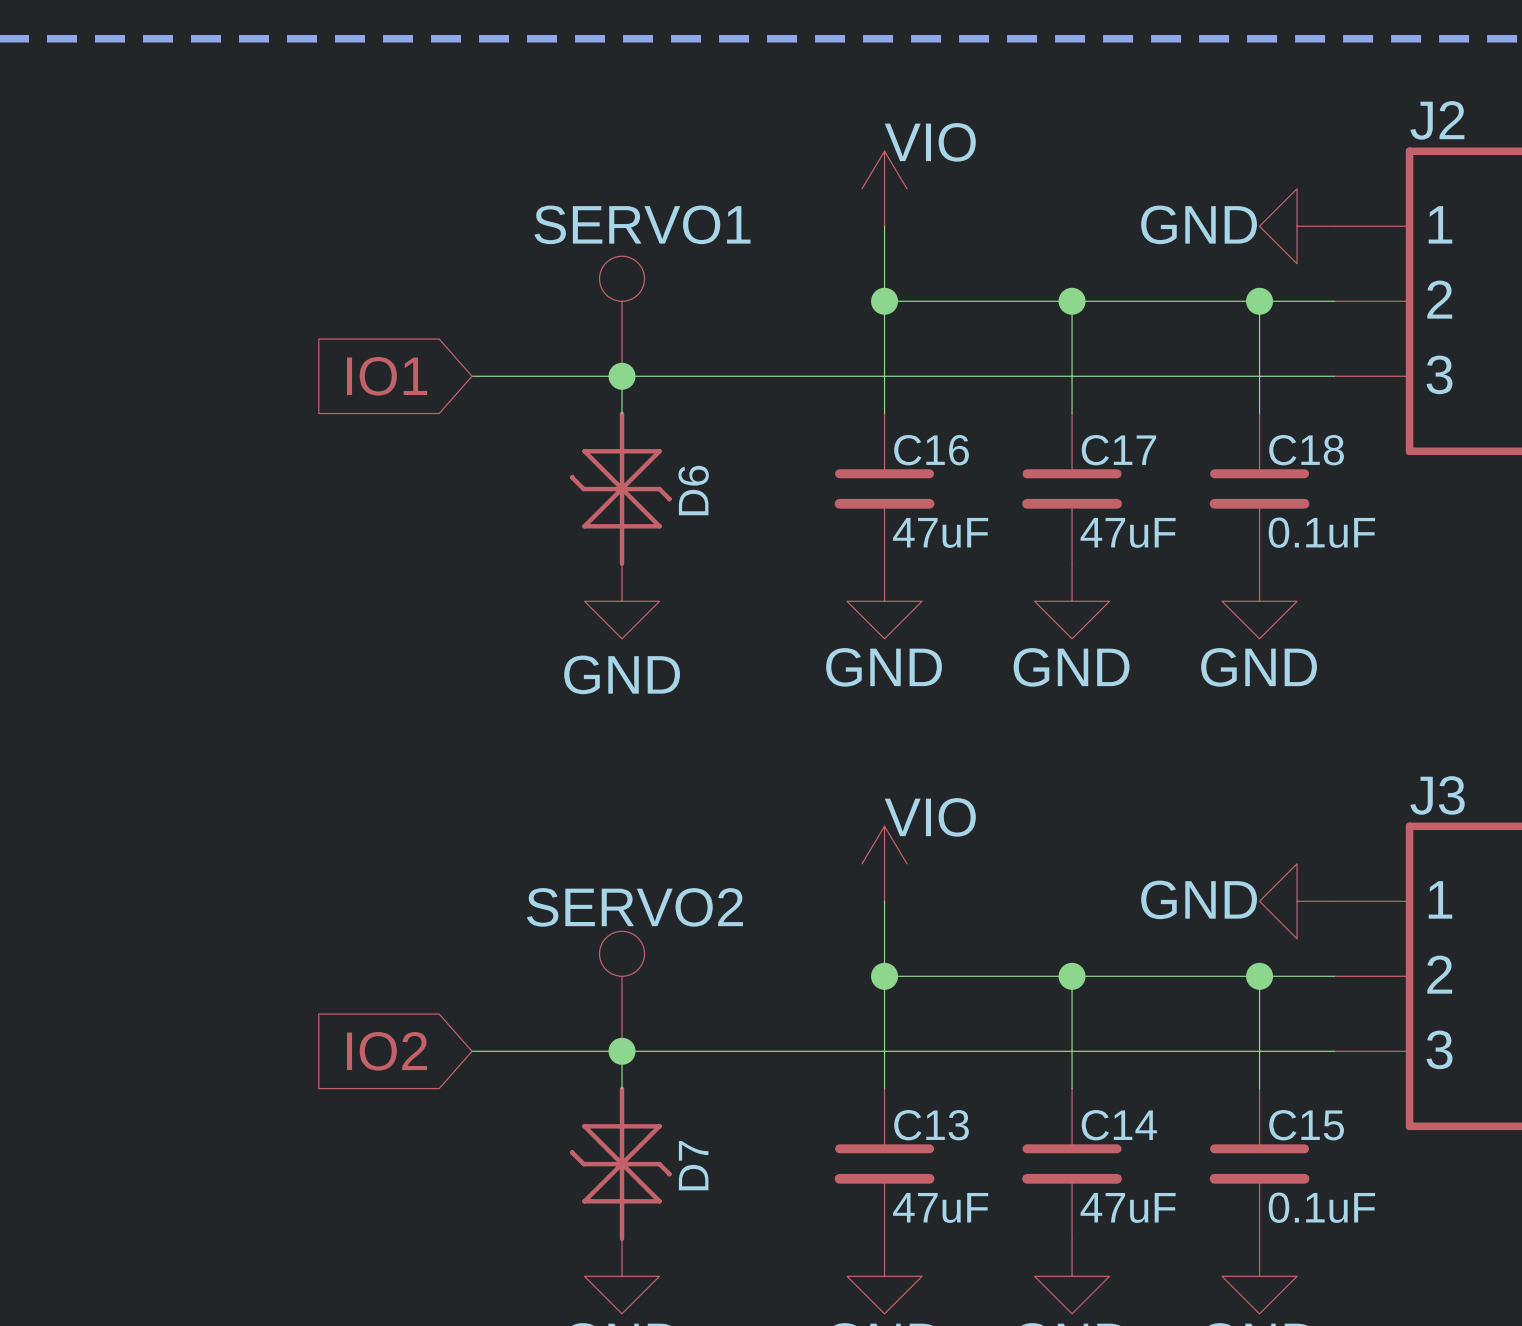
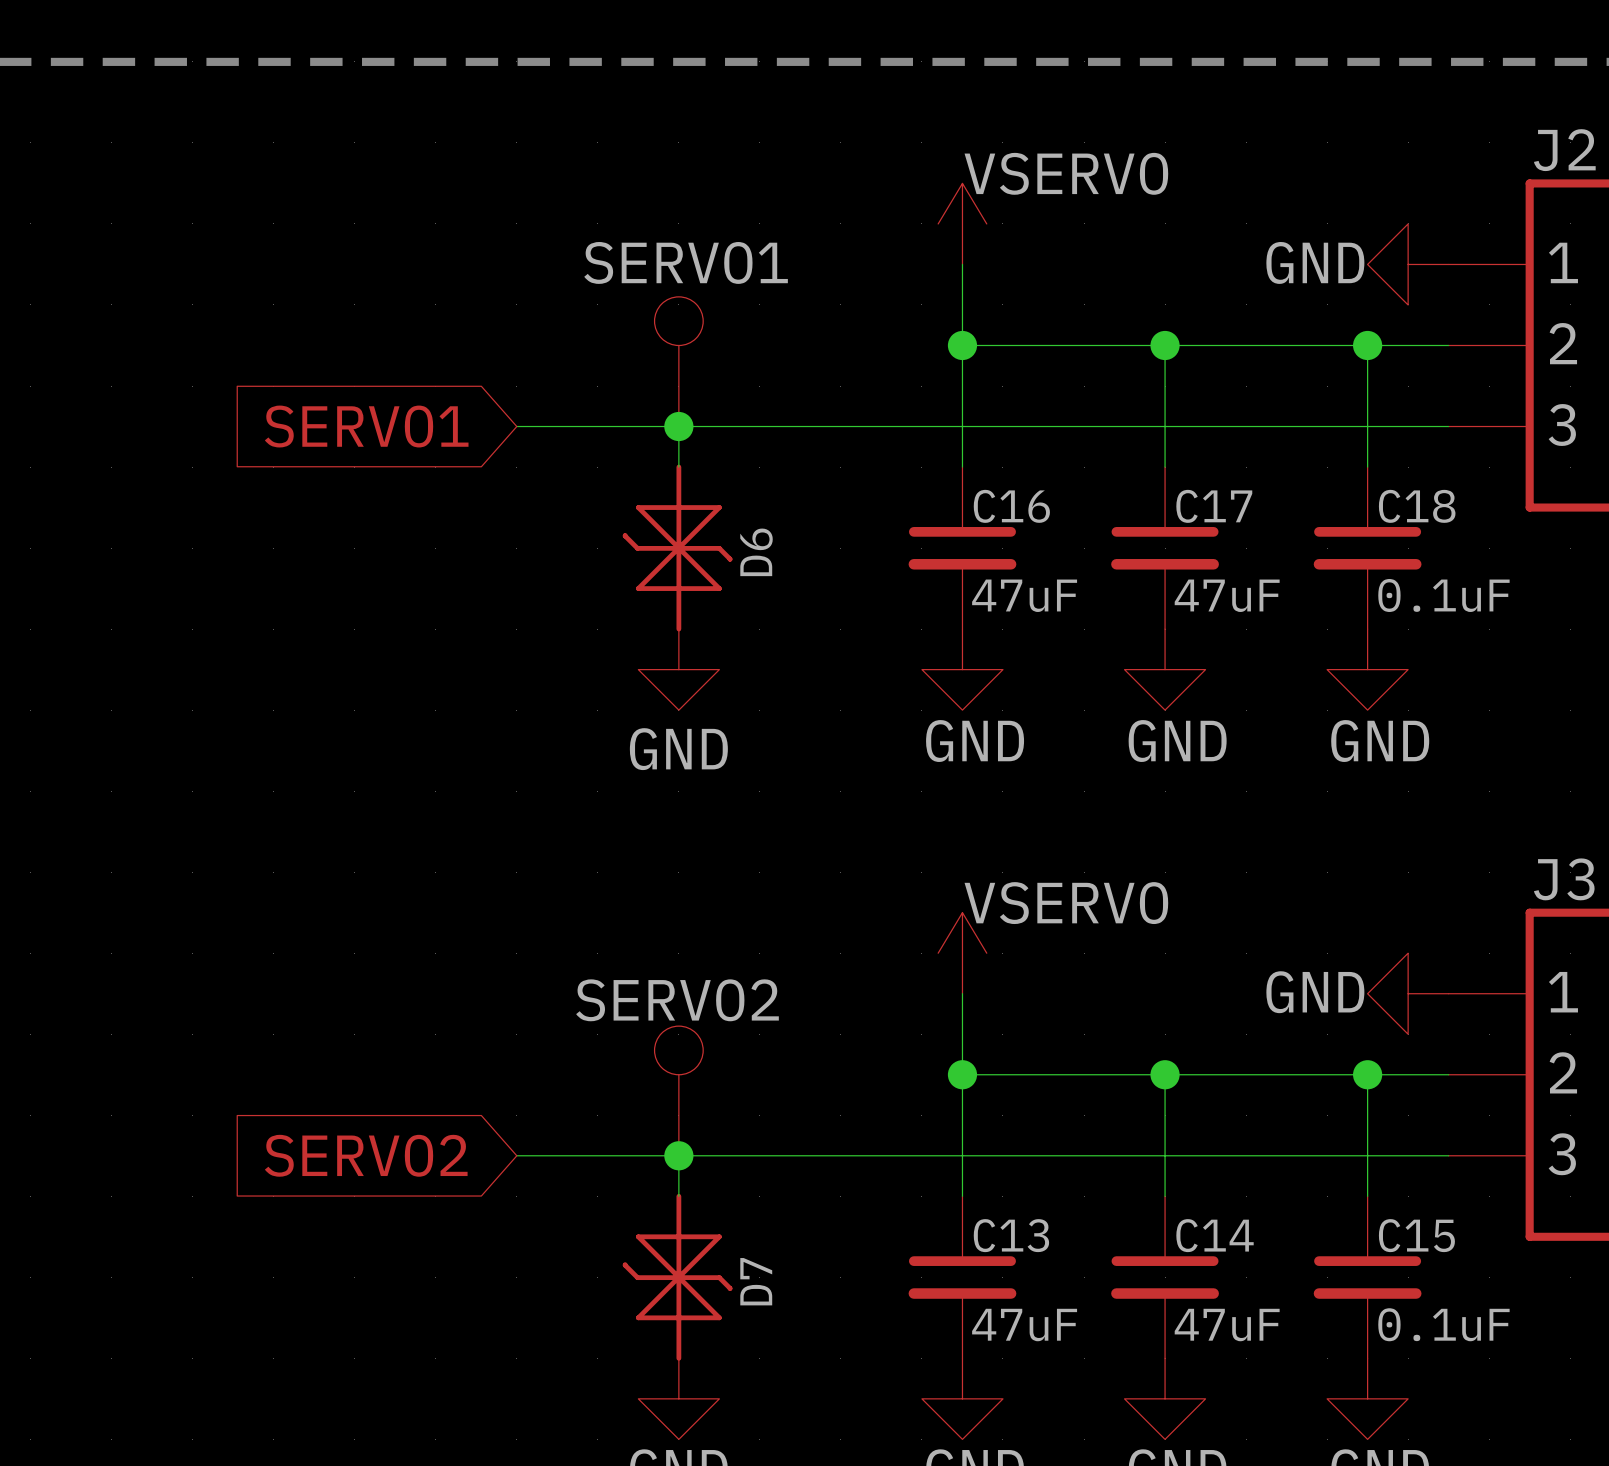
power symbol: VIO (884, 188) -> VSERVO (962, 223)
global label: IO1 (387, 376) -> SERVO1 (366, 426)
power symbol: VIO (884, 863) -> VSERVO (962, 953)
global label: IO2 (387, 1051) -> SERVO2 (366, 1155)

